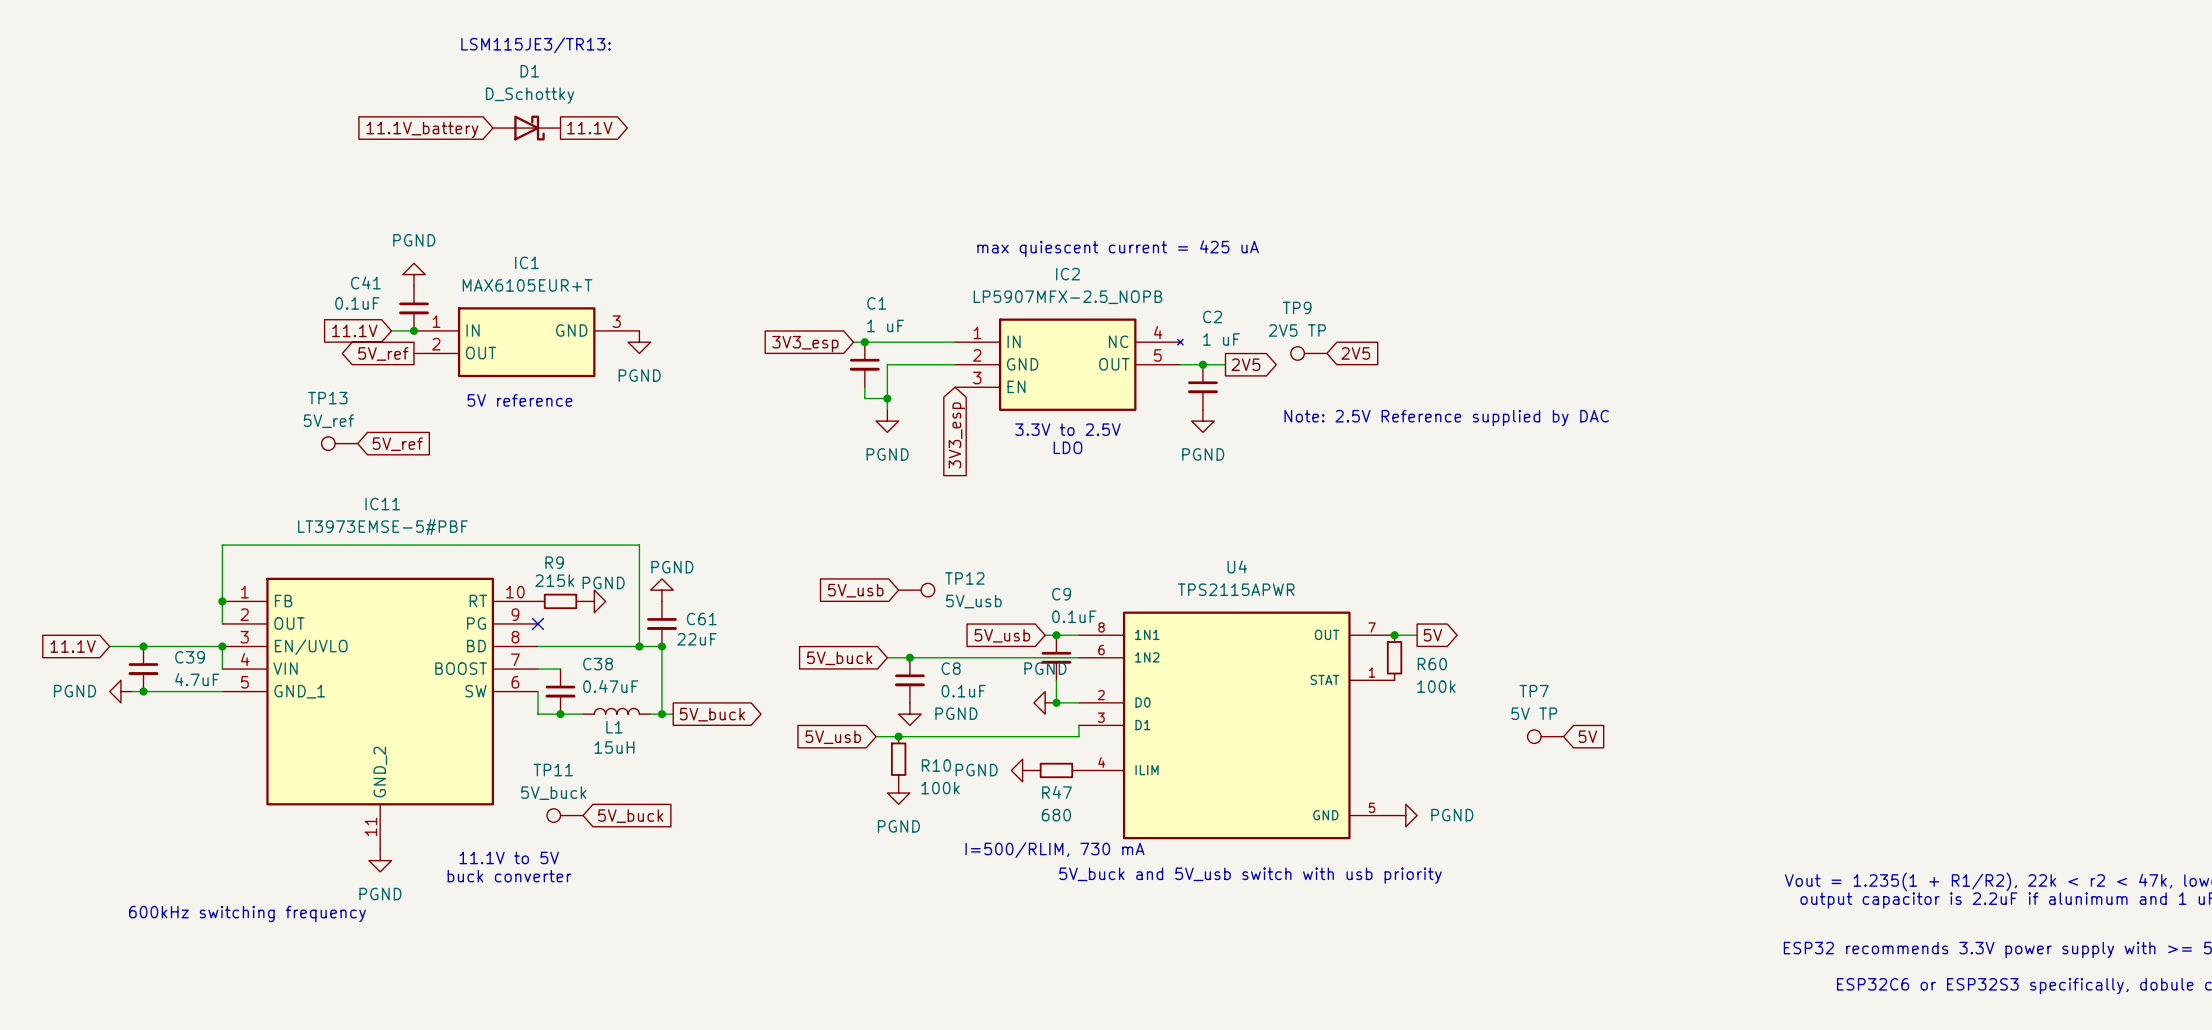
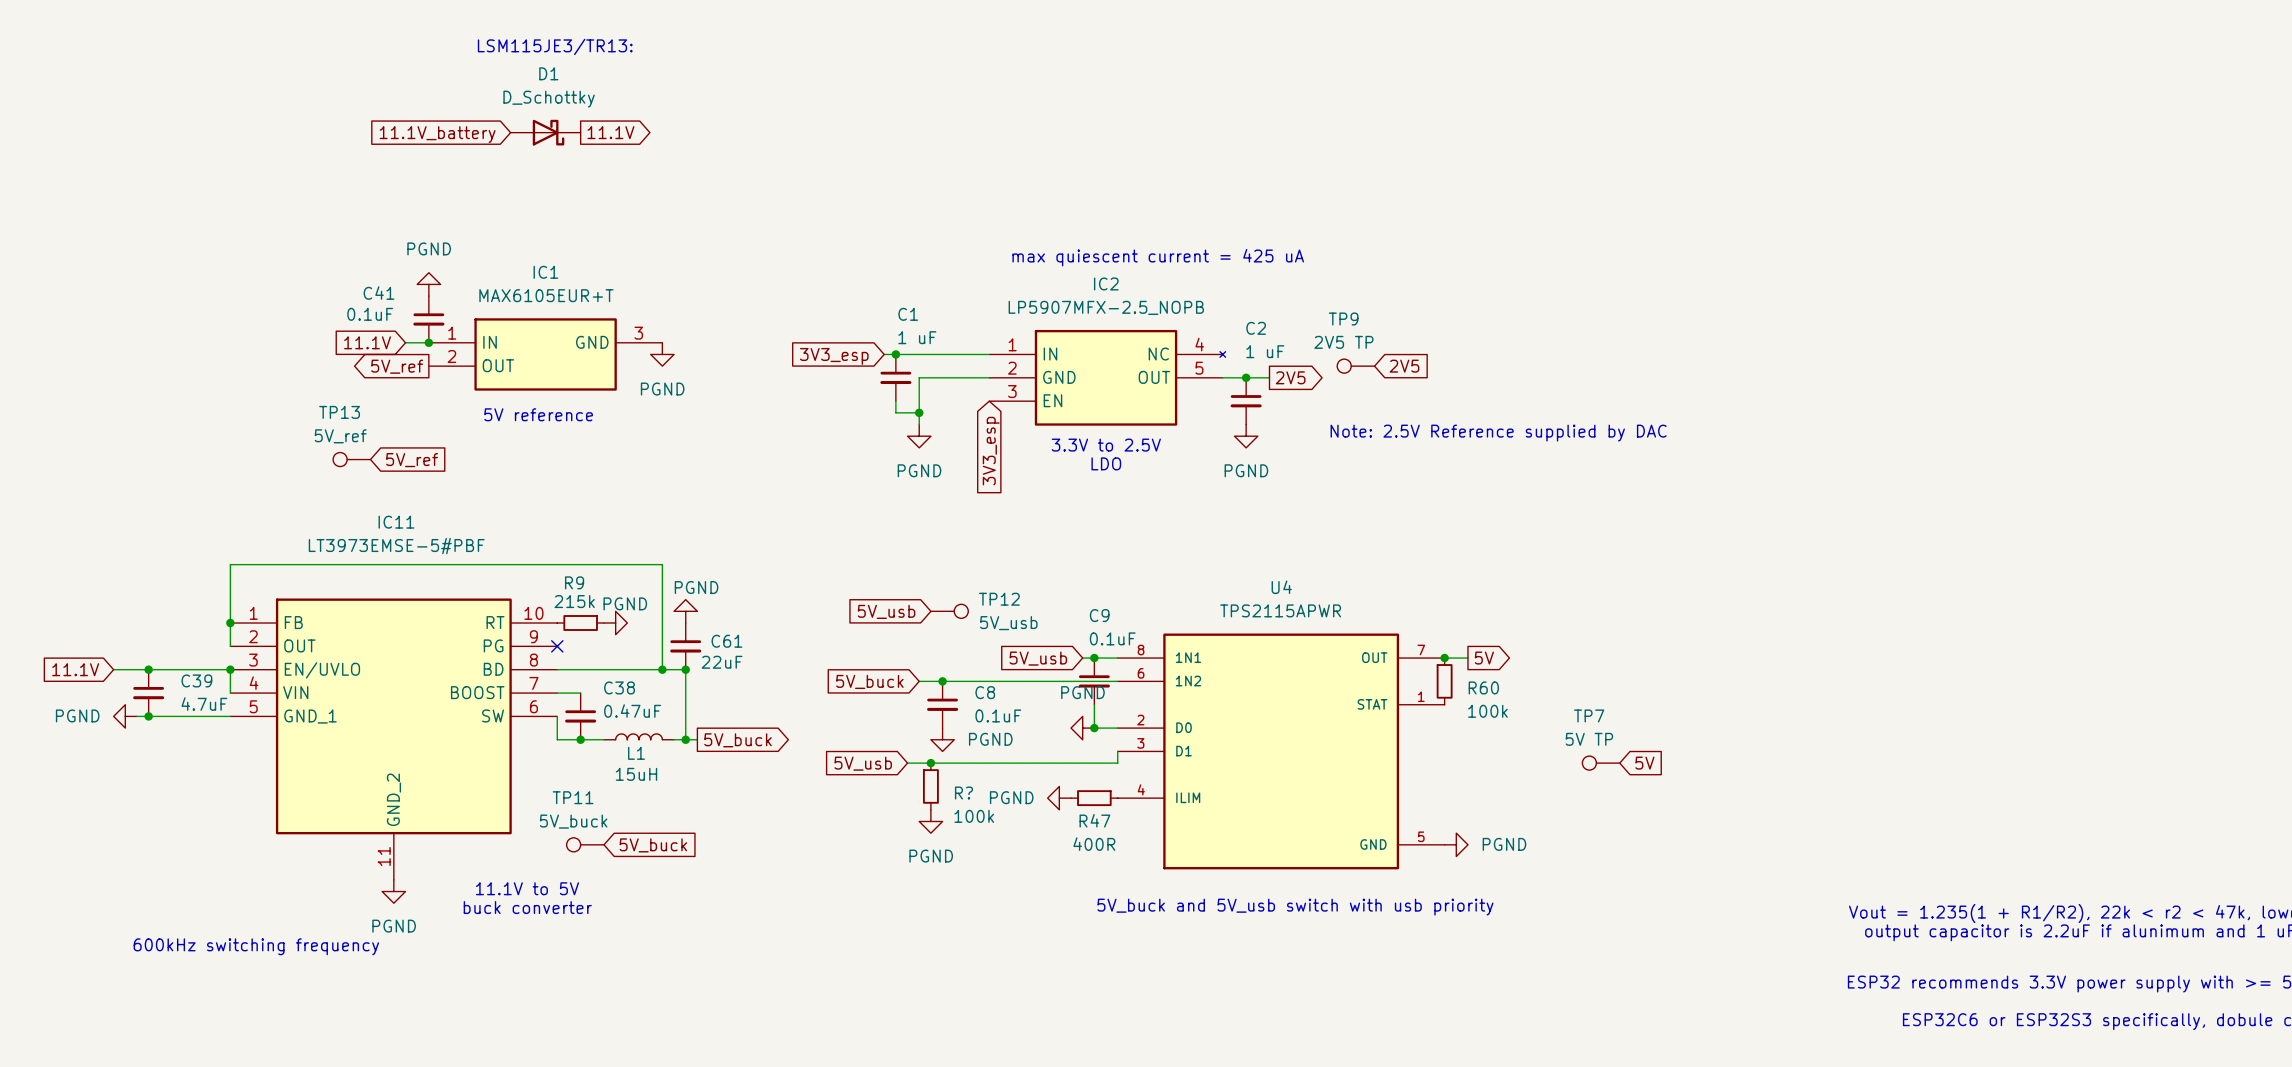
R10 name: R10 (936, 765) -> R? (963, 793)
R47 value: 680 (1056, 815) -> 400R (1094, 844)
text: I=500/RLIM, 730 mA (1054, 850) -> none

